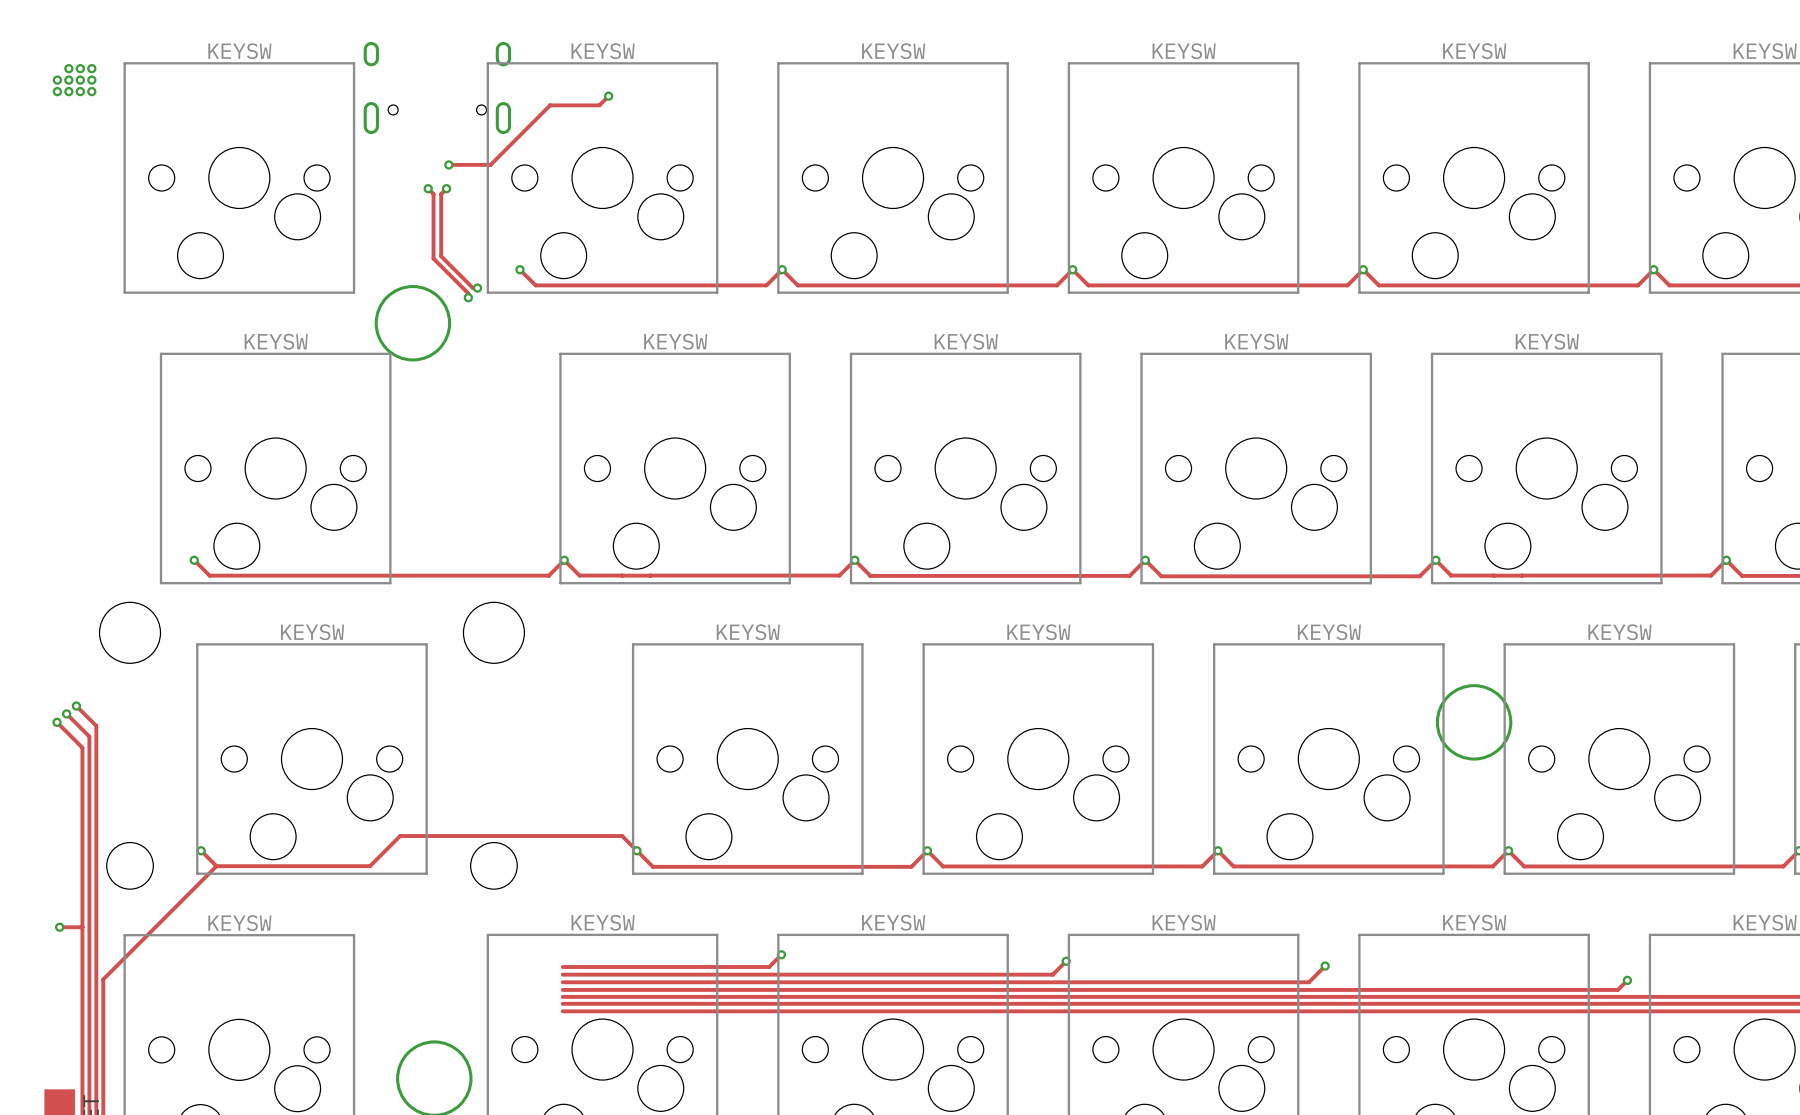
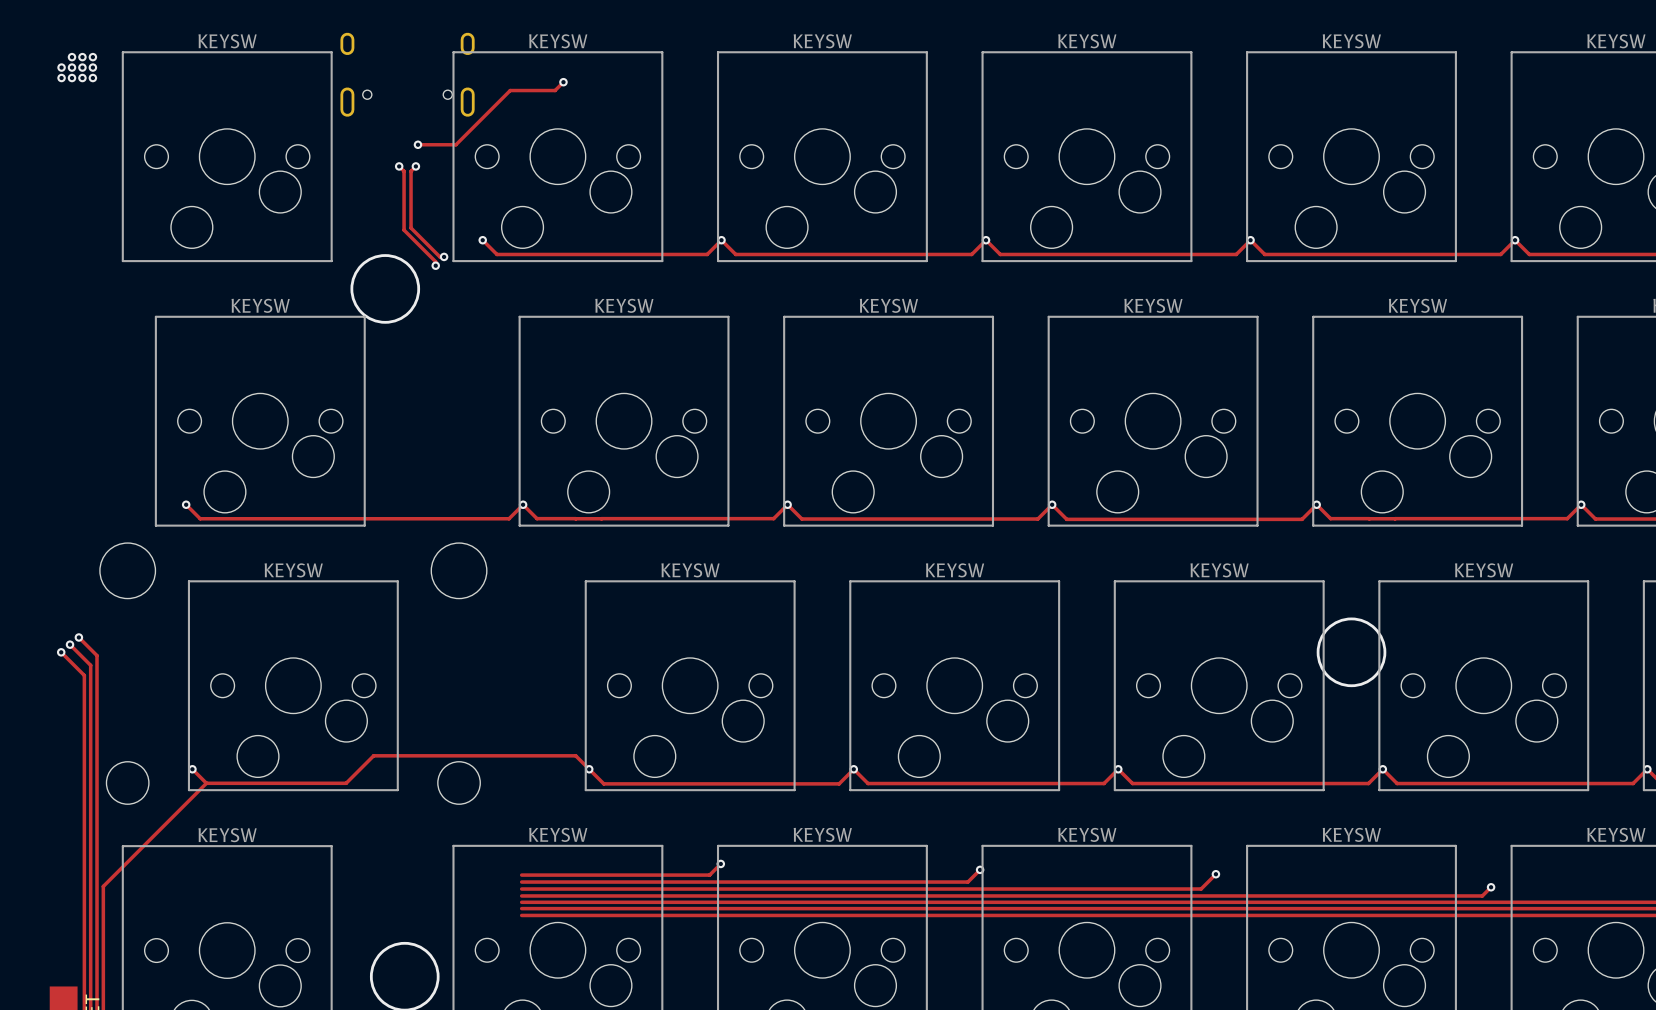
track: (59, 927) (82, 927) -> none
via: (59, 927) -> none

